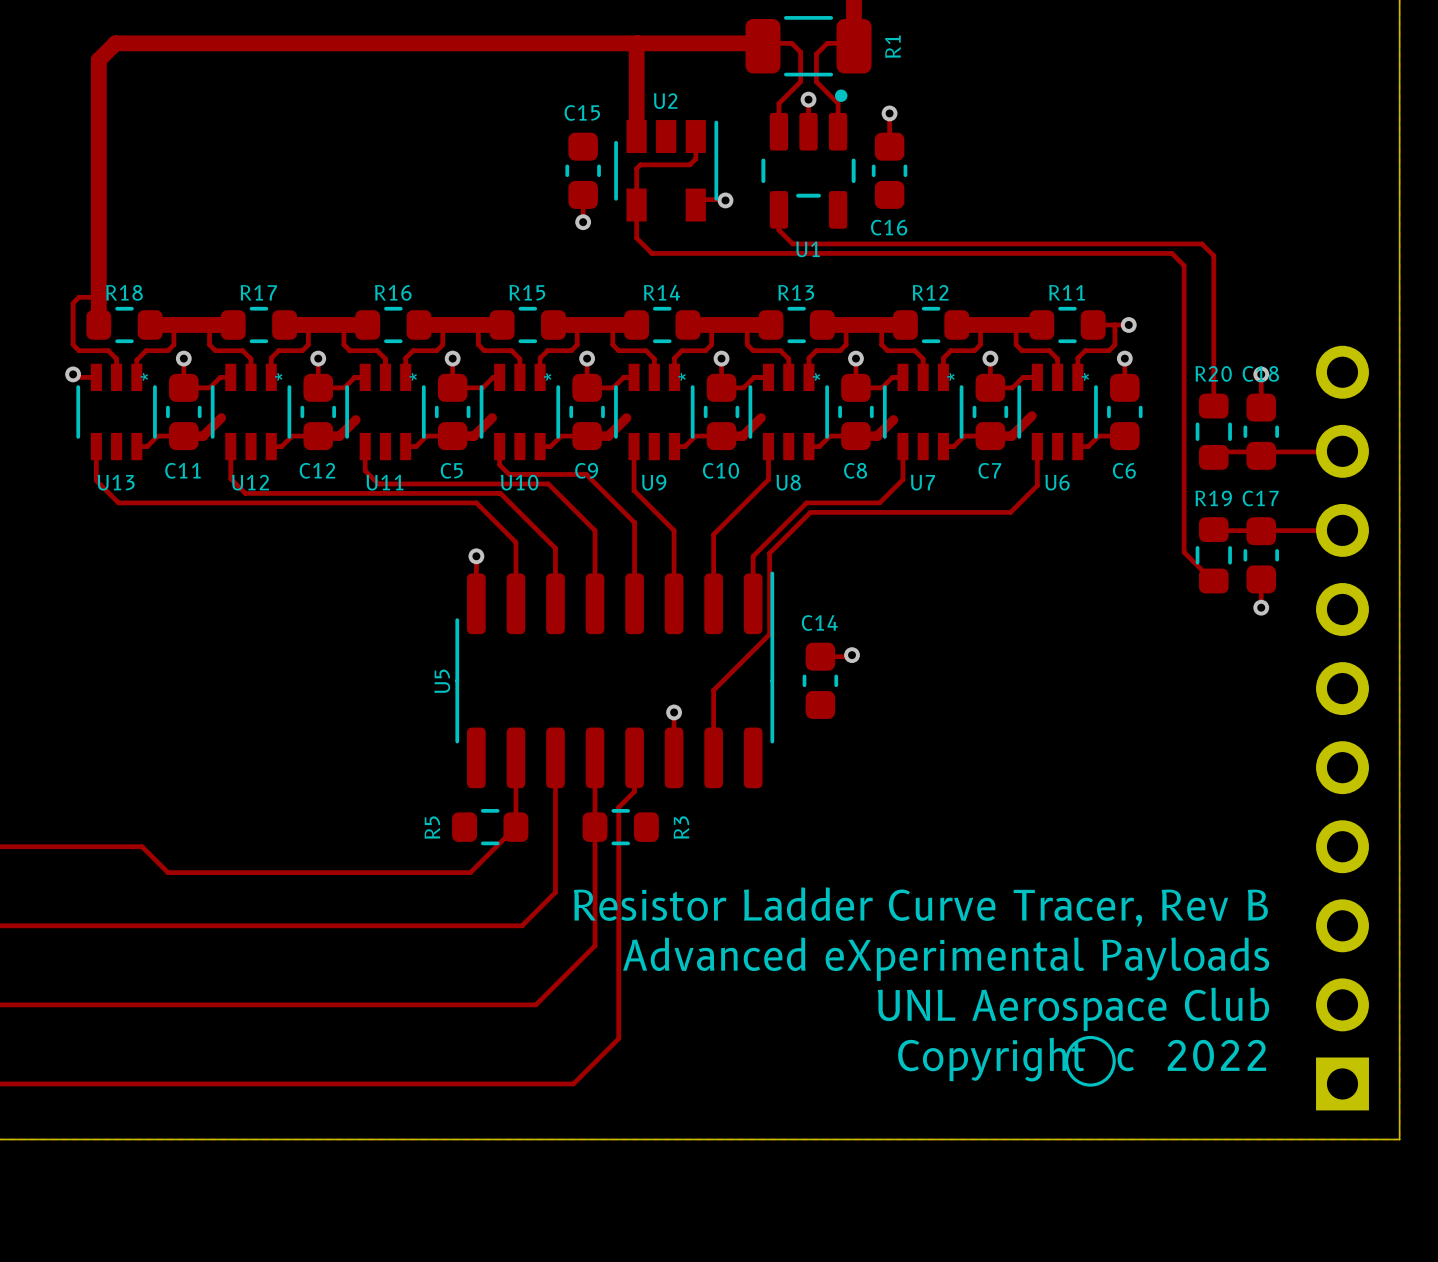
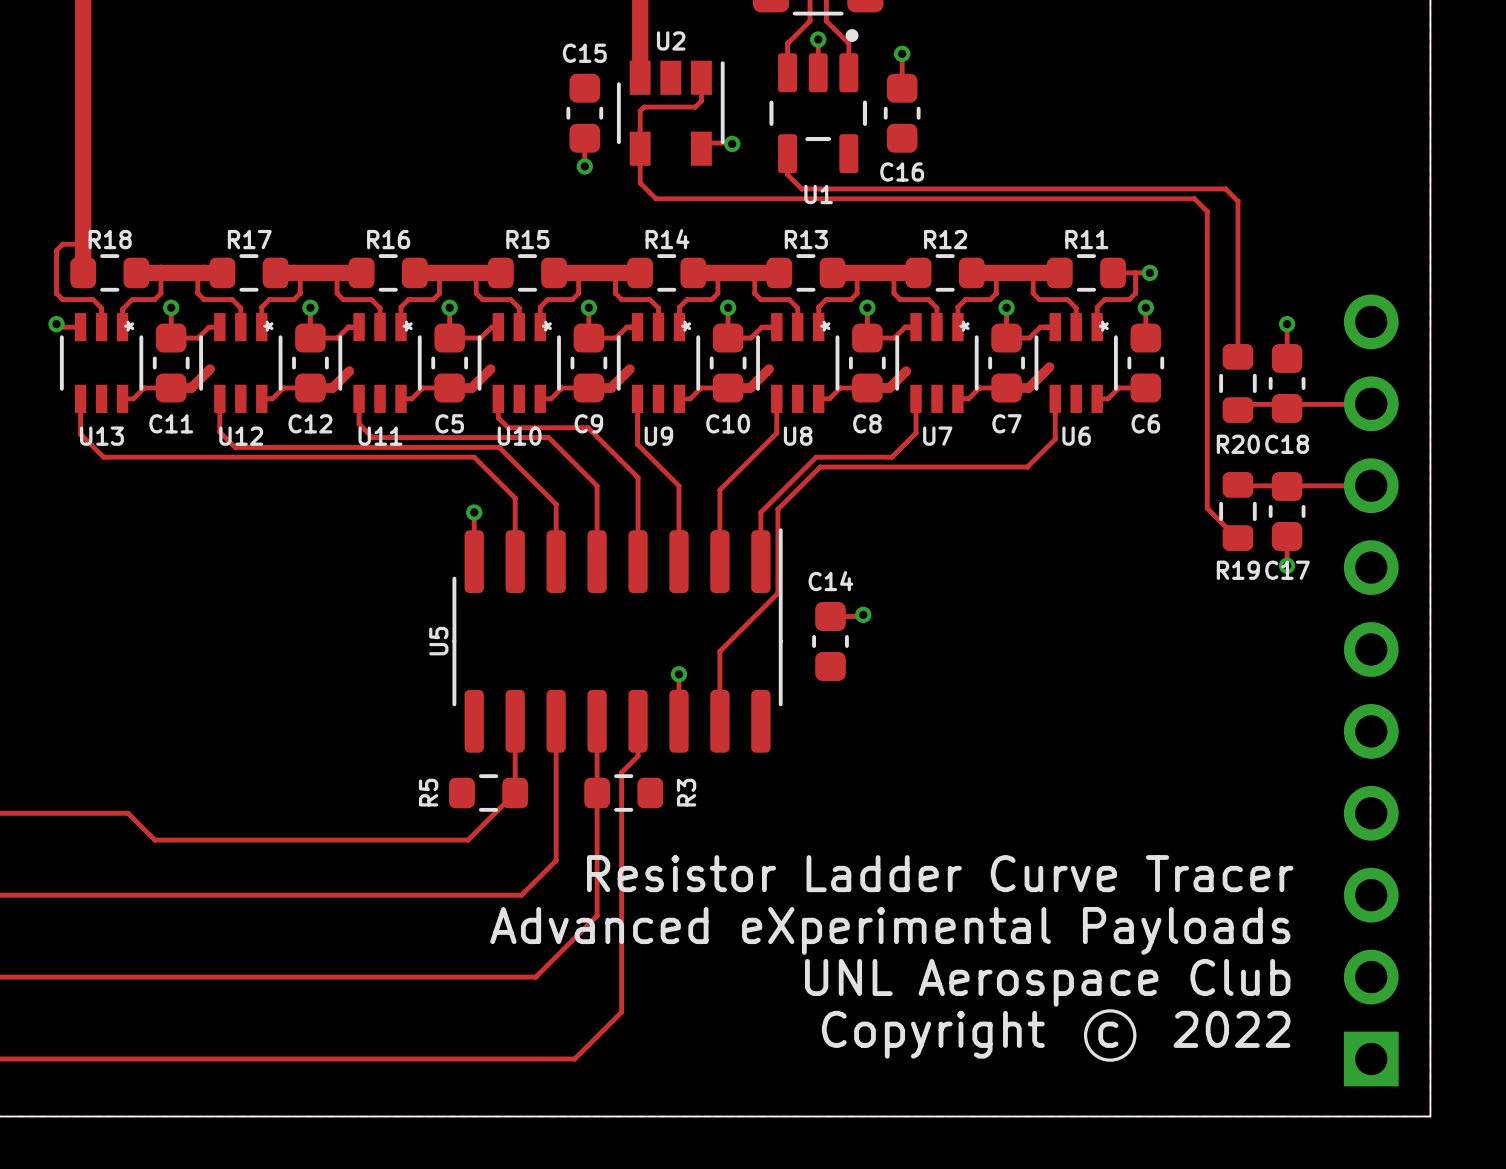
R20 name position: R20 (1213, 373) -> R20 (1238, 444)
C18 name position: C18 (1260, 373) -> C18 (1287, 444)
R19 name position: R19 (1213, 498) -> R19 (1238, 570)
C17 name position: C17 (1260, 498) -> C17 (1287, 570)
text: Resistor Ladder Curve Tracer, Rev B (920, 907) -> Resistor Ladder Curve Tracer (940, 873)

